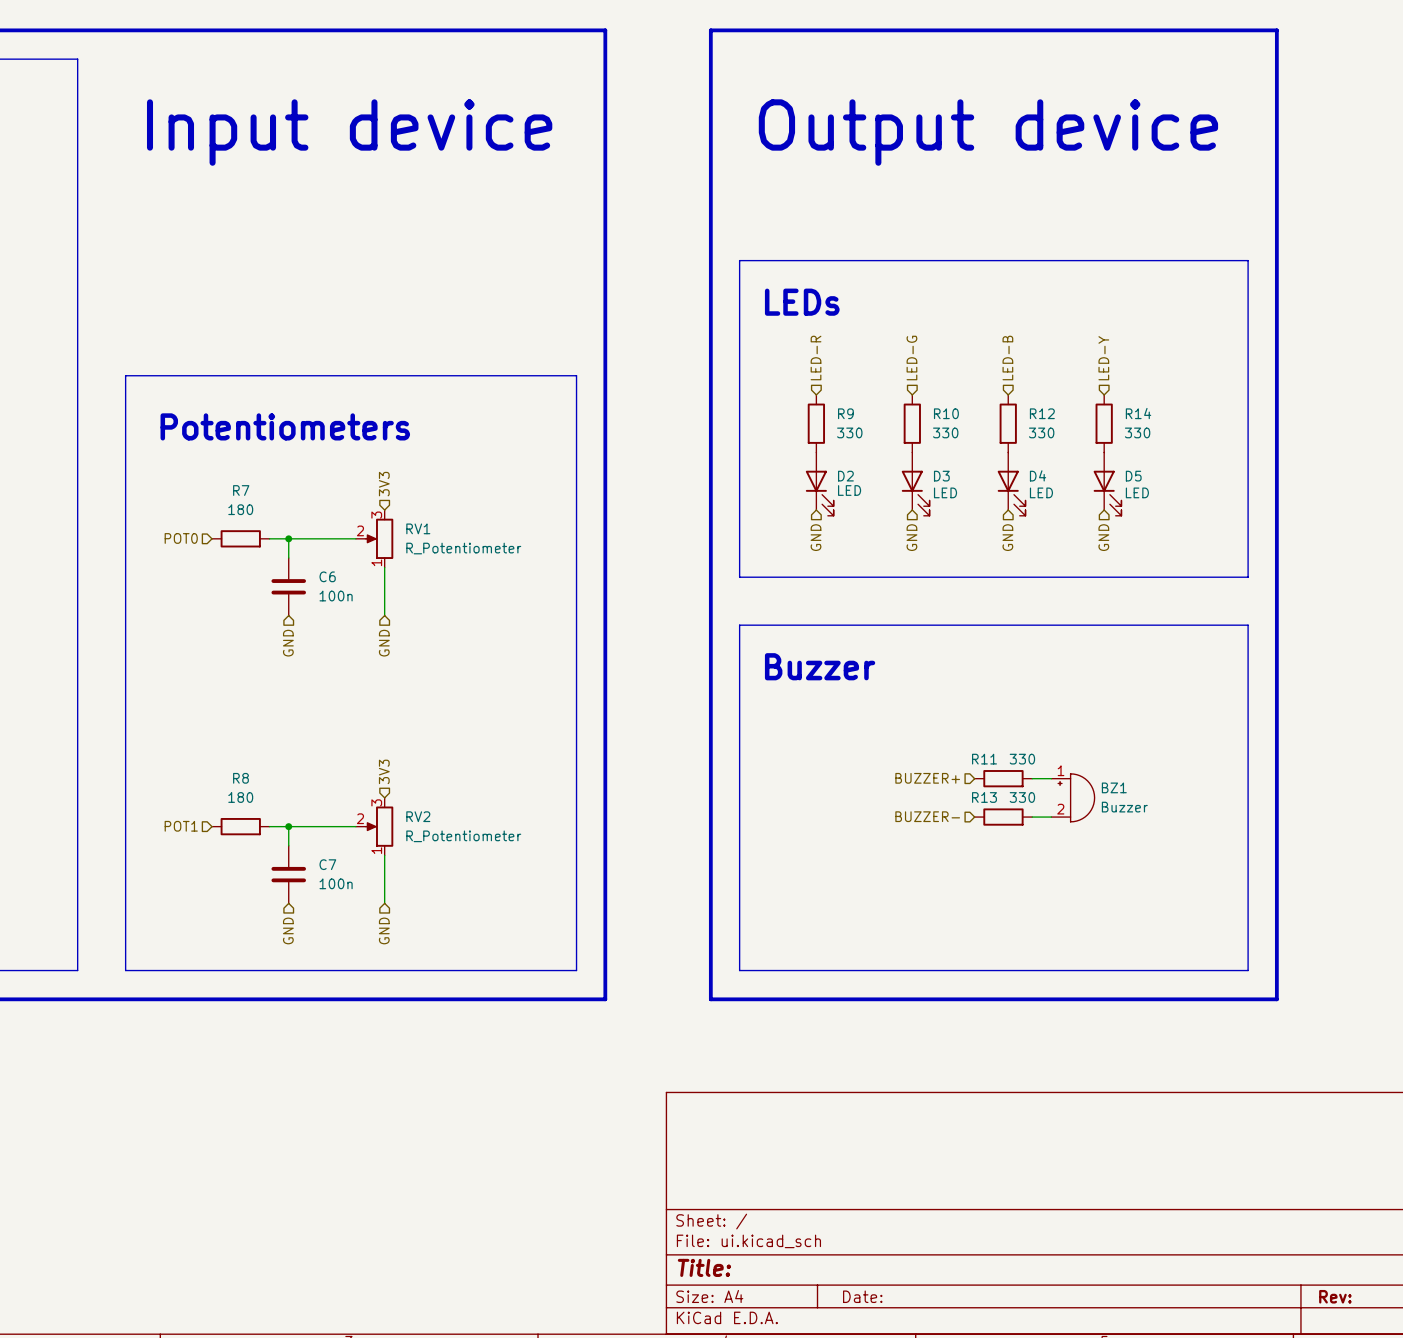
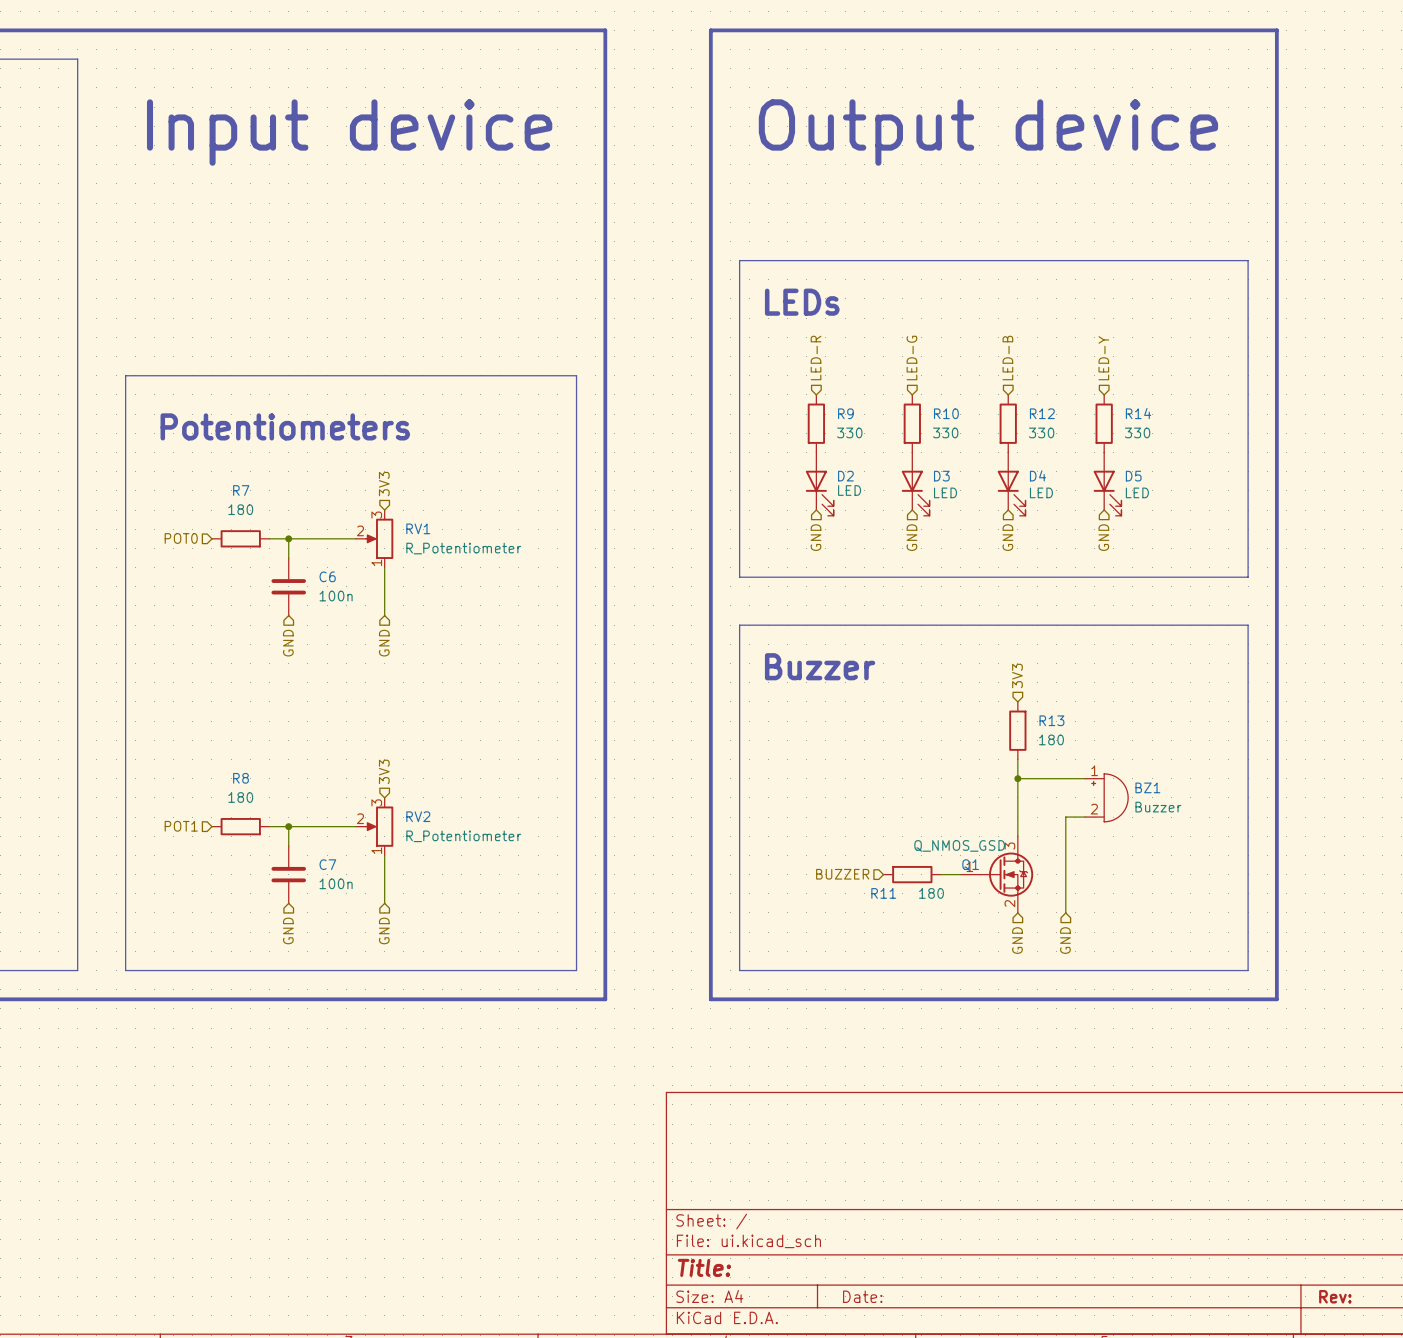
hierarchical label: none -> 3V3 (1017, 675)
R11 name position: R11 (984, 759) -> R11 (883, 893)
wire: none -> (1017, 759) (1017, 836)
R11 value: 330 (1022, 759) -> 180 (931, 893)
hierarchical label: BUZZER+ (927, 778) -> none
R11 position: (1003, 778) -> (912, 874)
junction: none -> (1017, 778)
R13 name position: R13 (984, 797) -> R13 (1051, 720)
R13 value: 330 (1022, 797) -> 180 (1051, 739)
BZ1 position: (1073, 797) -> (1106, 797)
hierarchical label: BUZZER- (927, 816) -> none
R13 rotation: 0° (1003, 817) -> 90° clockwise (1017, 730)
R13 position: (1003, 817) -> (1017, 730)
wire: (1032, 817) (1051, 817) -> (941, 874) (960, 874)
wire: none -> (1084, 817) (1065, 817) (1065, 912)
hierarchical label: none -> BUZZER (842, 874)
Q1: none -> Q_NMOS_GSD (996, 874)
hierarchical label: none -> GND (1017, 940)
hierarchical label: none -> GND (1065, 940)

